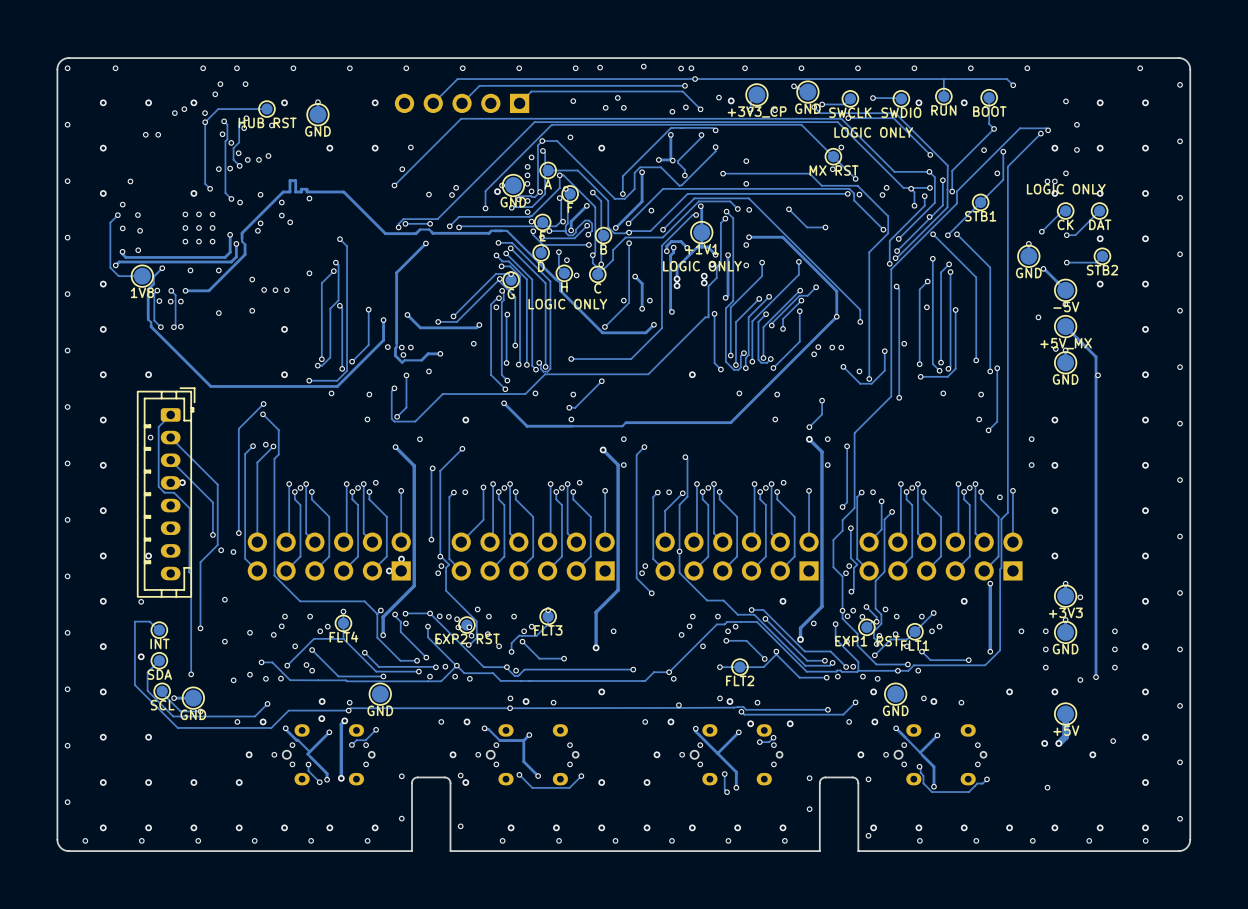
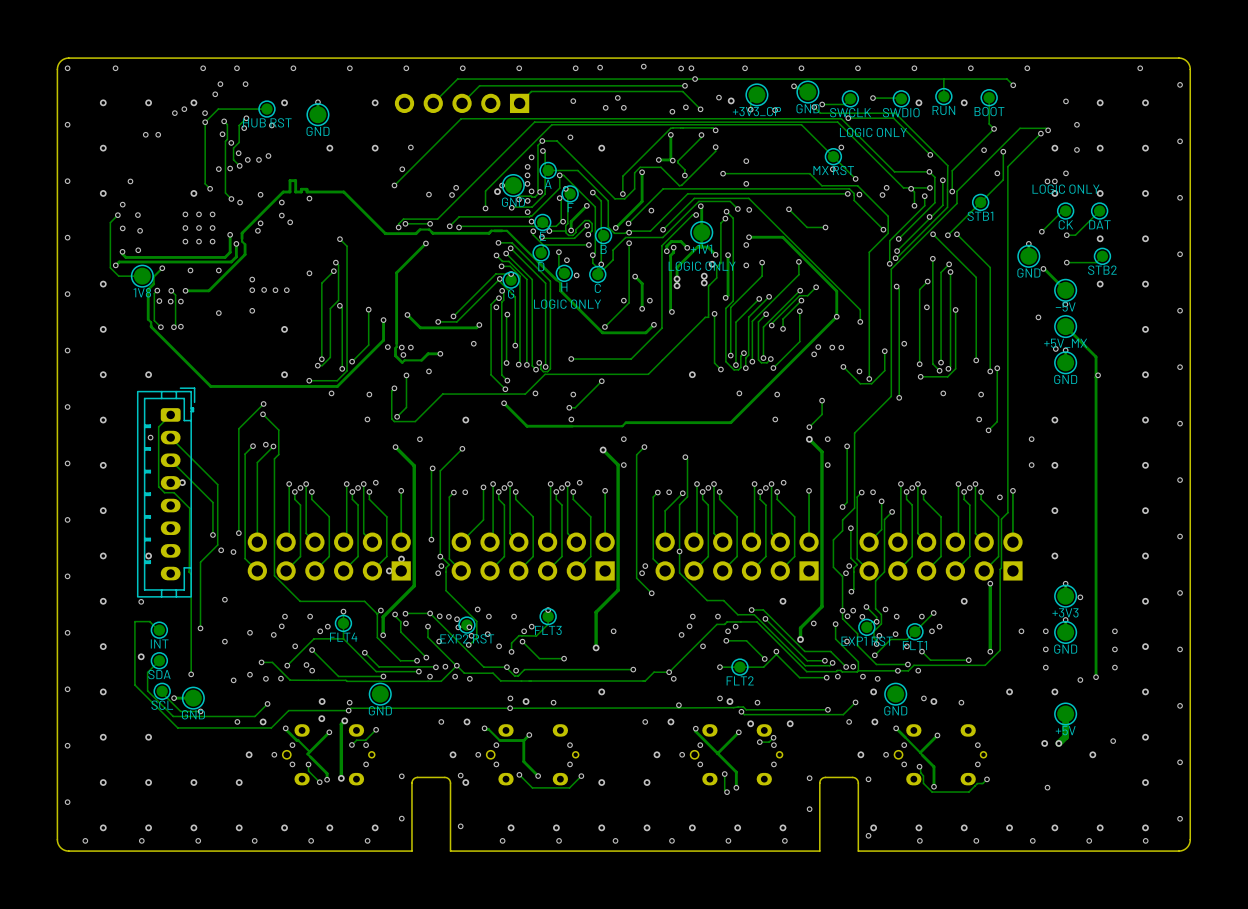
via: none -> (252, 290)

